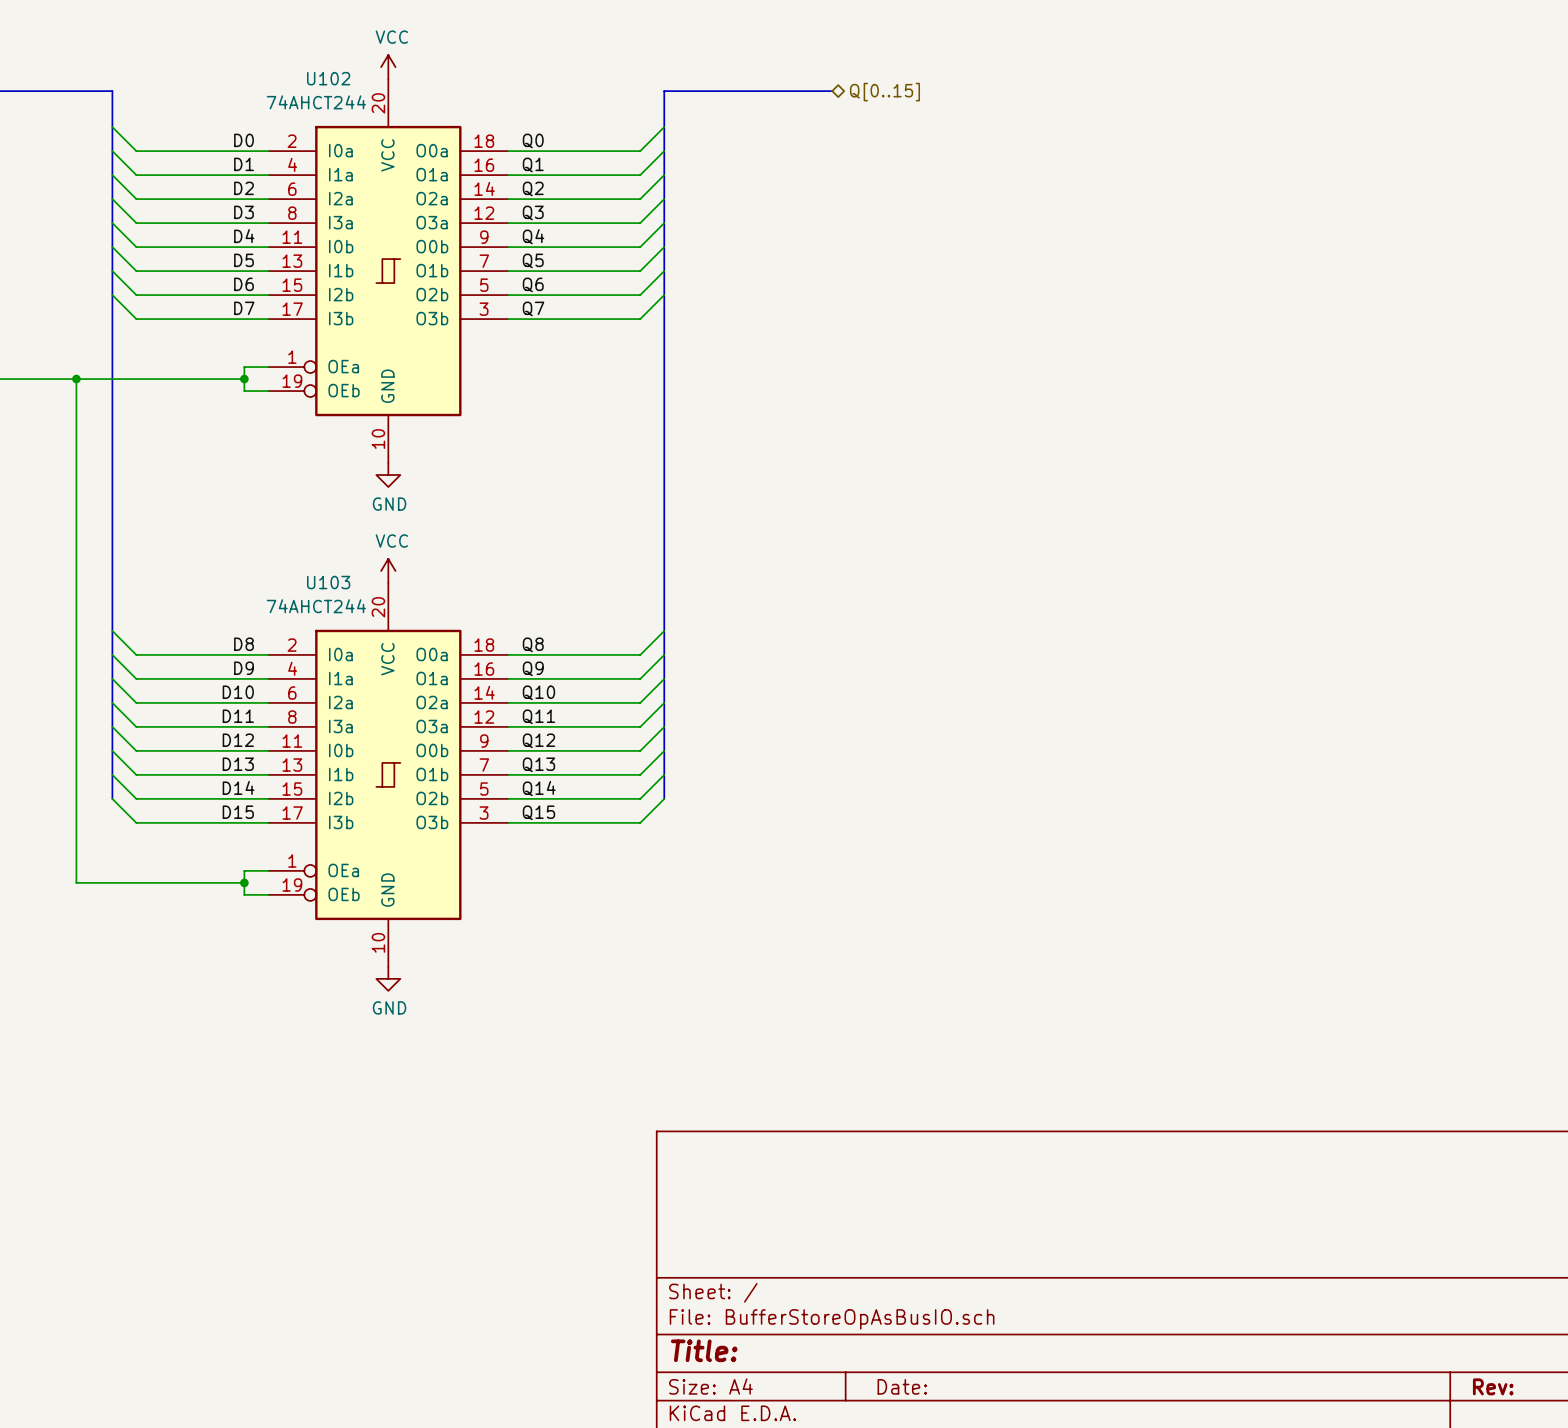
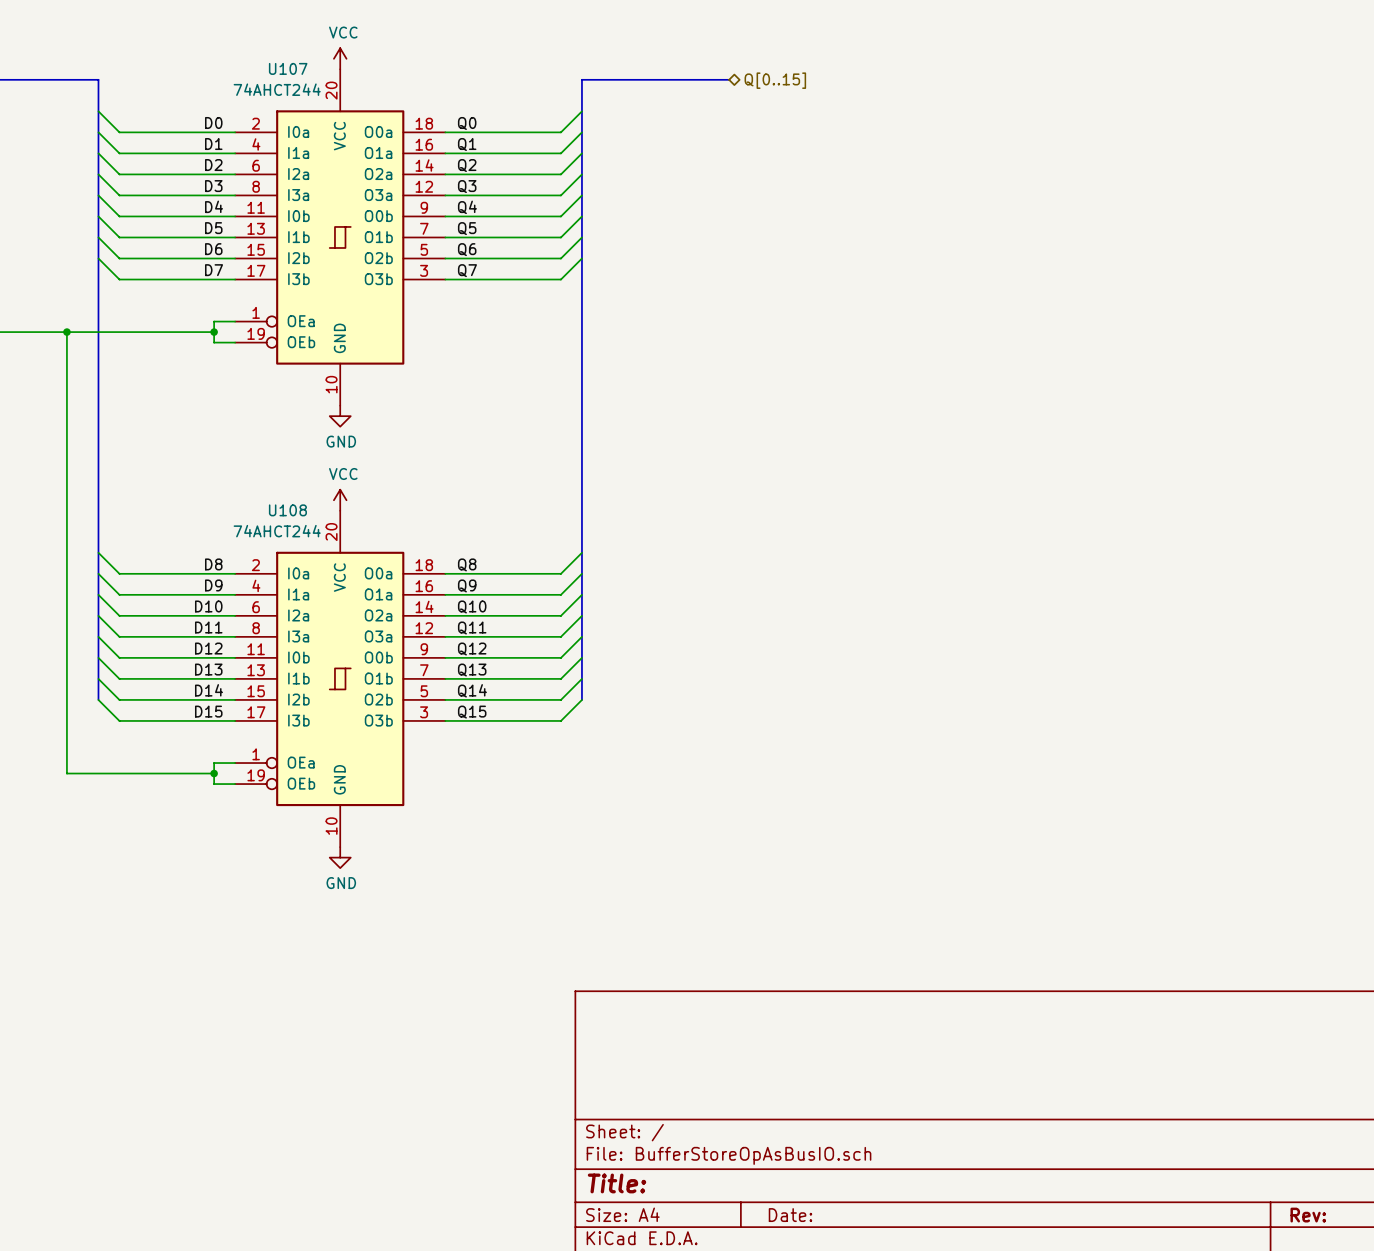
U102 name: U102 (328, 78) -> U107 (288, 68)
U103 name: U103 (328, 582) -> U108 (287, 510)

